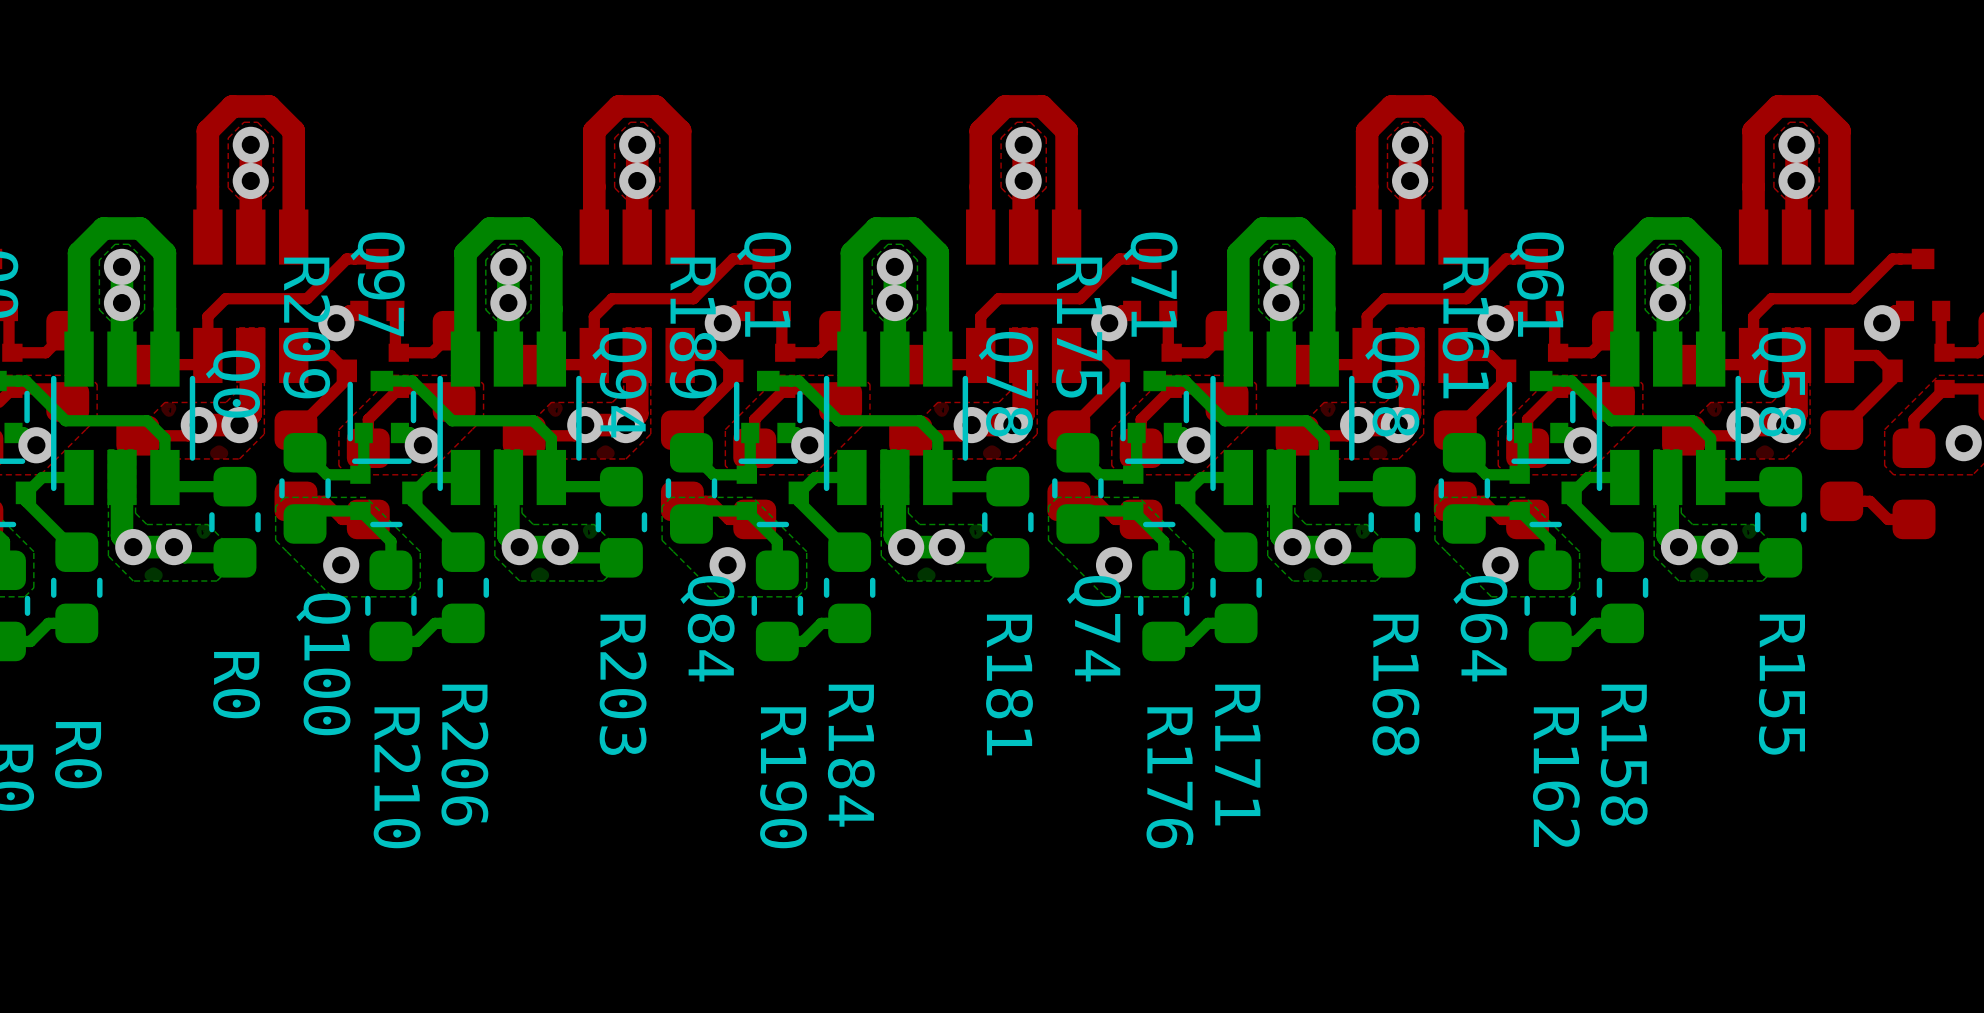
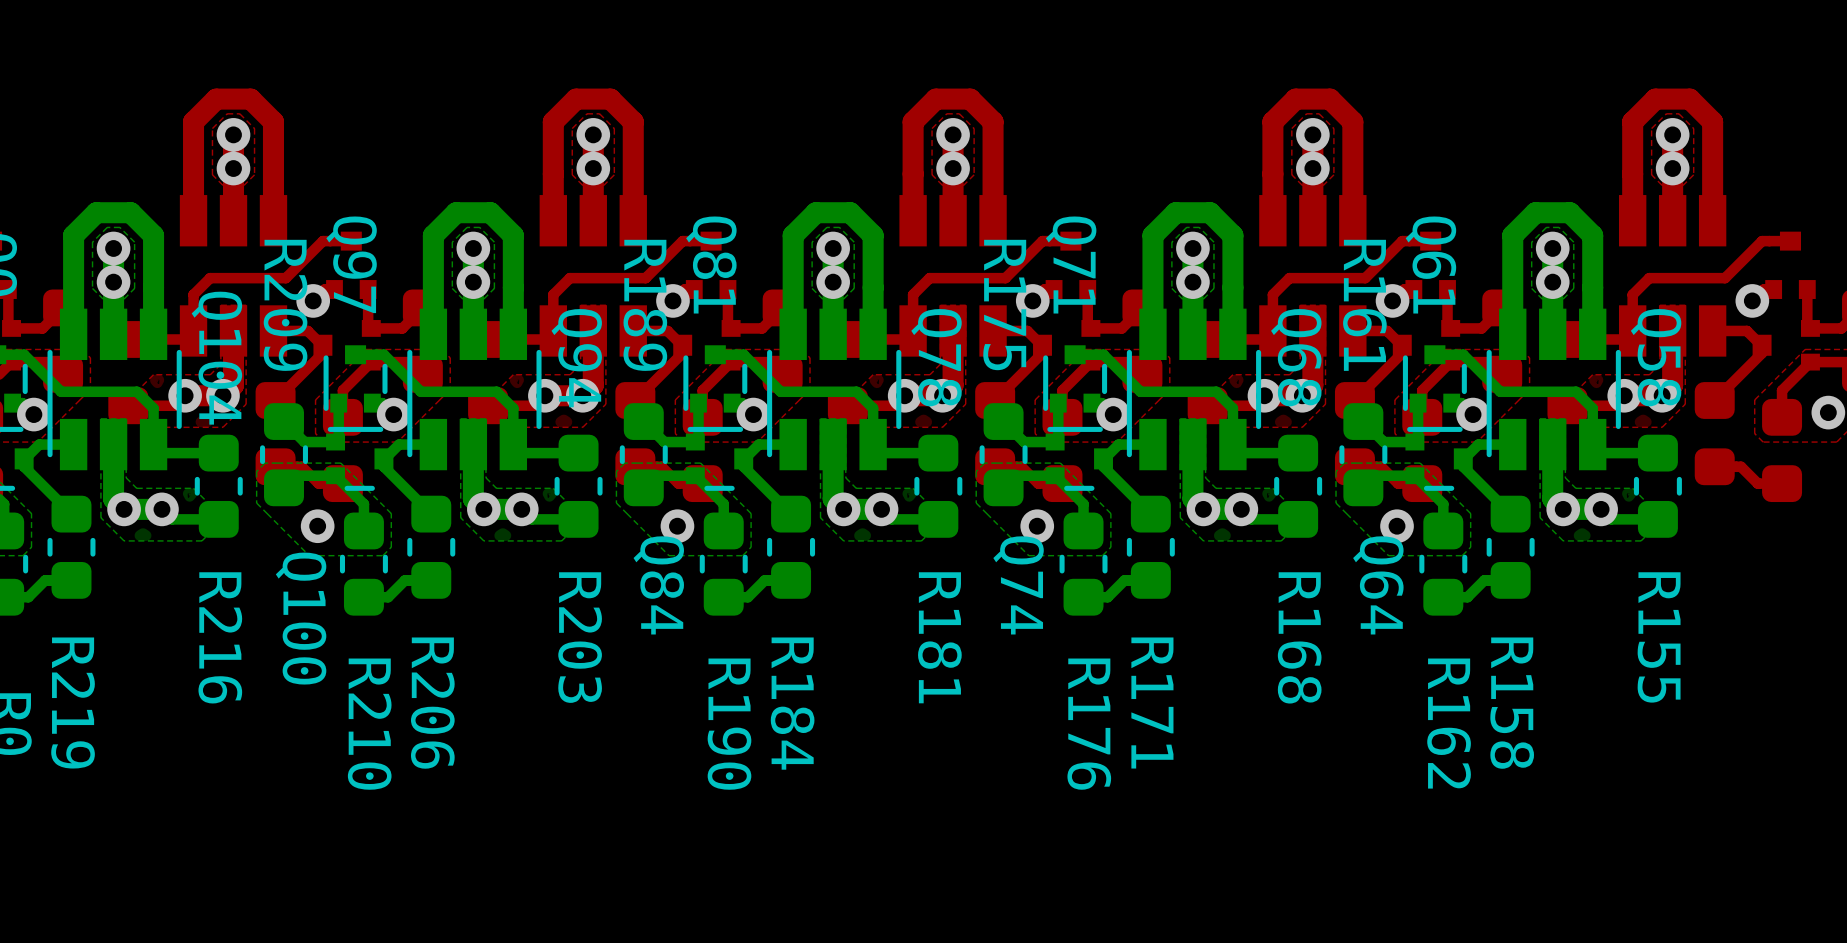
Q0 name: Q0 (232, 384) -> Q104 (216, 358)
R0 name: R0 (236, 685) -> R216 (220, 637)
R0 name: R0 (78, 755) -> R219 (73, 703)

